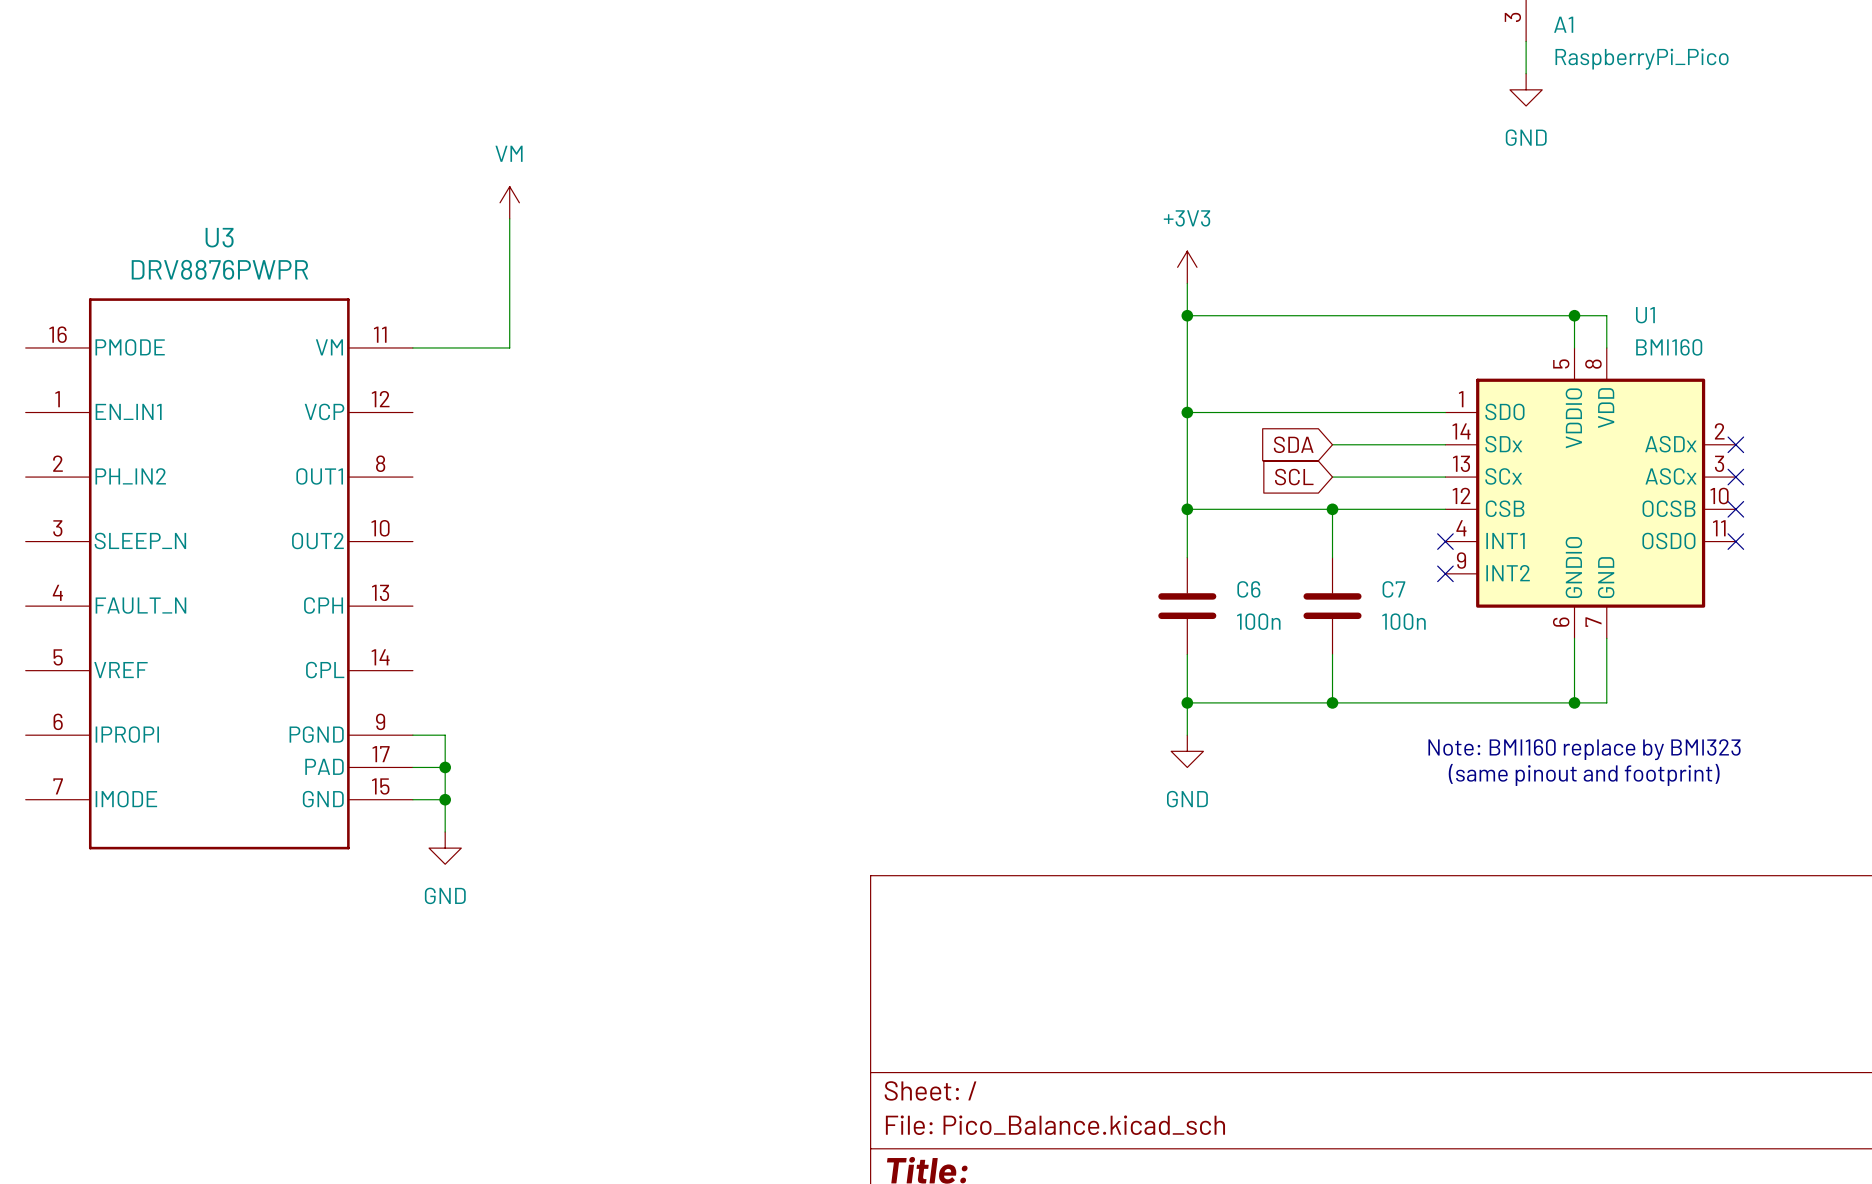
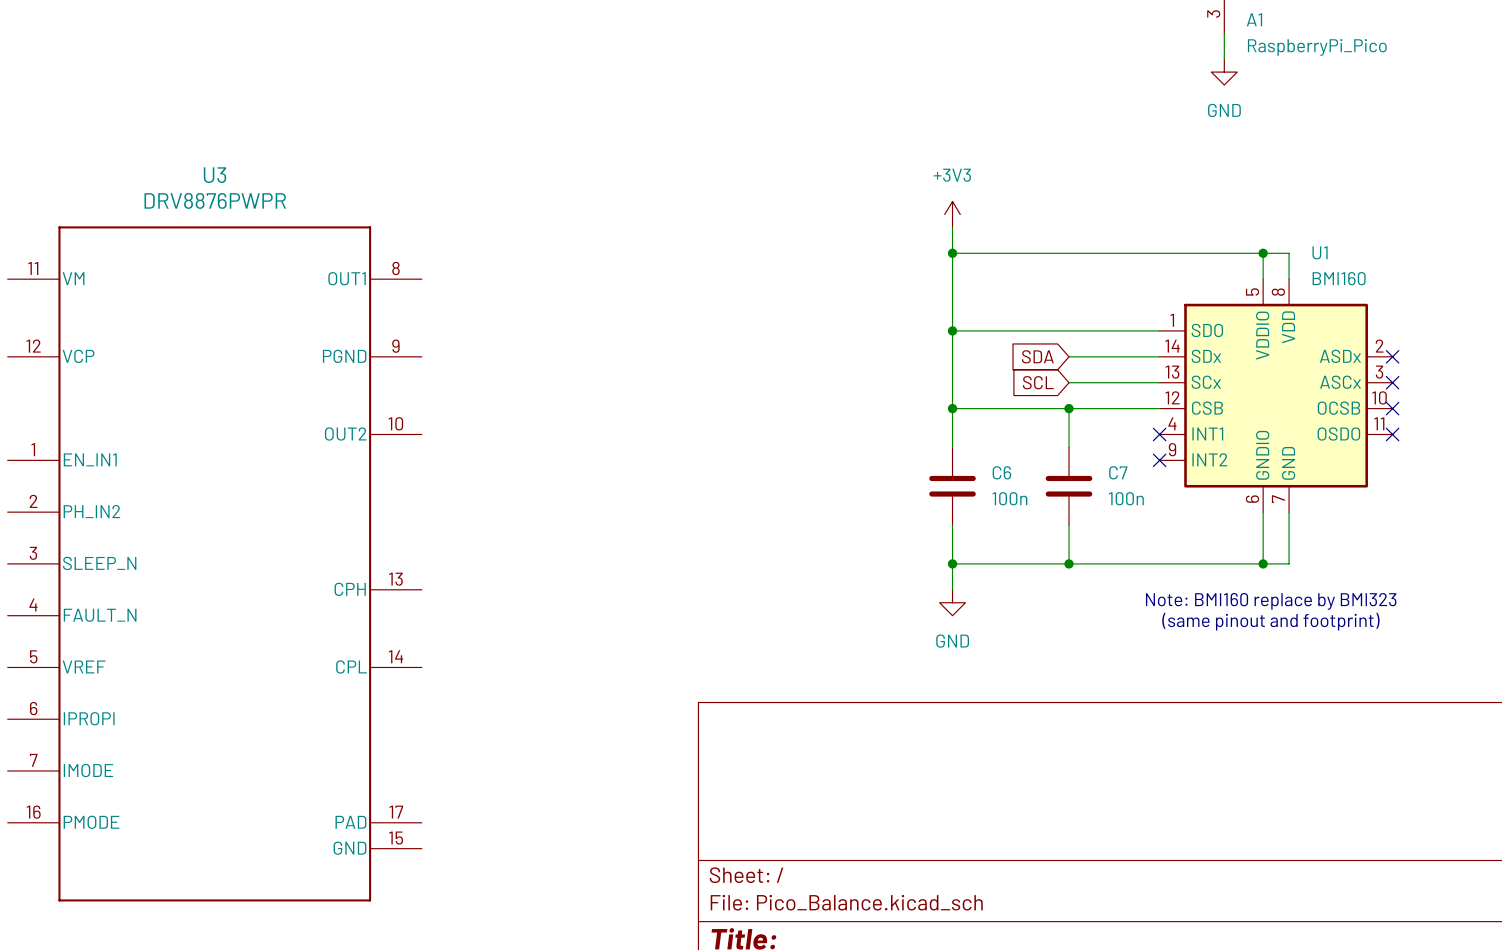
power symbol: VM (509, 202) -> none
wire: (509, 218) (509, 347) (412, 347) -> none
U3 name position: U3 (219, 237) -> U3 (215, 175)
U3 value position: DRV8876PWPR (219, 269) -> DRV8876PWPR (215, 200)
U3 symbol: [25, 298, 413, 850] -> [7, 226, 422, 902]
wire: (412, 735) (445, 735) (445, 831) -> none
wire: (412, 767) (445, 767) -> none
junction: (445, 767) -> none
wire: (412, 799) (445, 799) -> none
junction: (445, 799) -> none
power symbol: GND (445, 848) -> none

